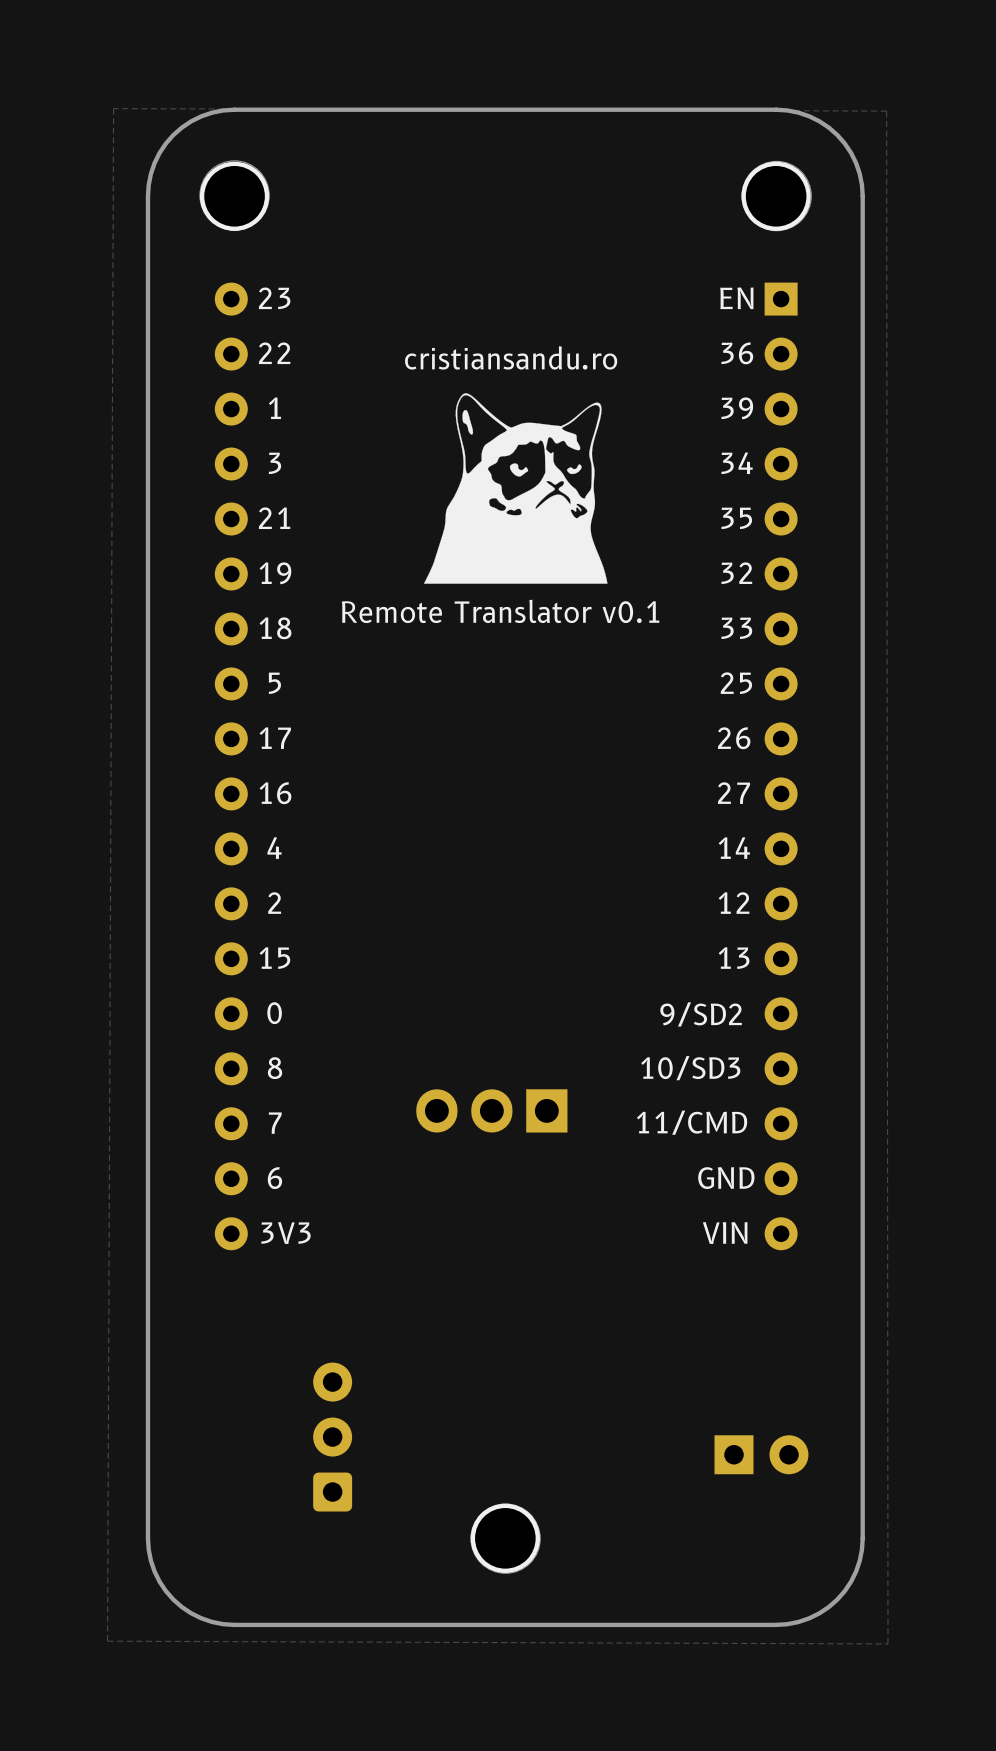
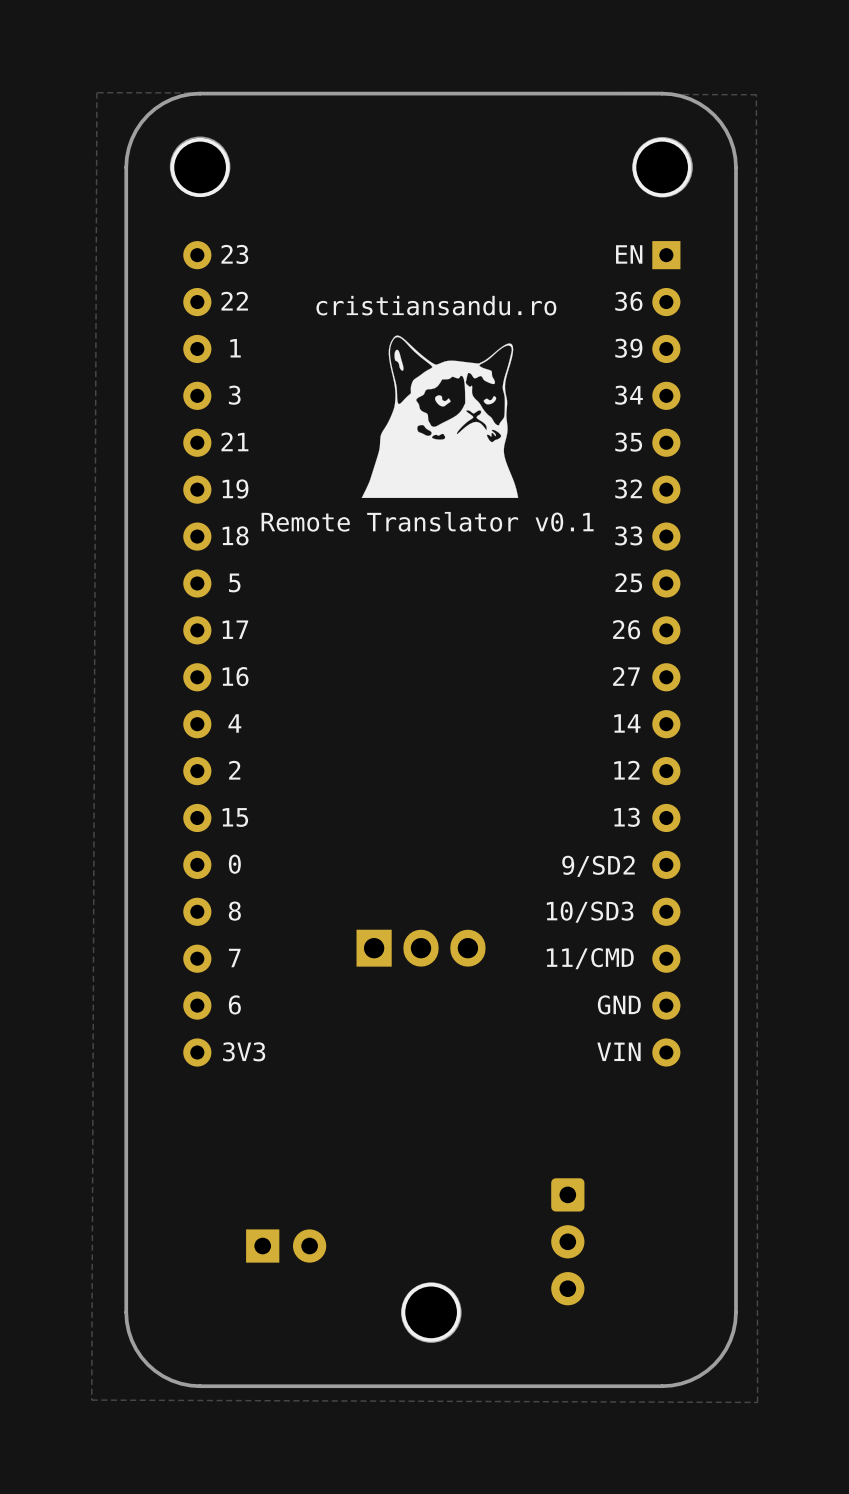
part rotation: 0° (491, 1110) -> 180° (421, 948)
part rotation: 0° (332, 1437) -> 180° (567, 1241)
part position: (332, 1437) -> (567, 1241)
part position: (761, 1454) -> (286, 1246)

